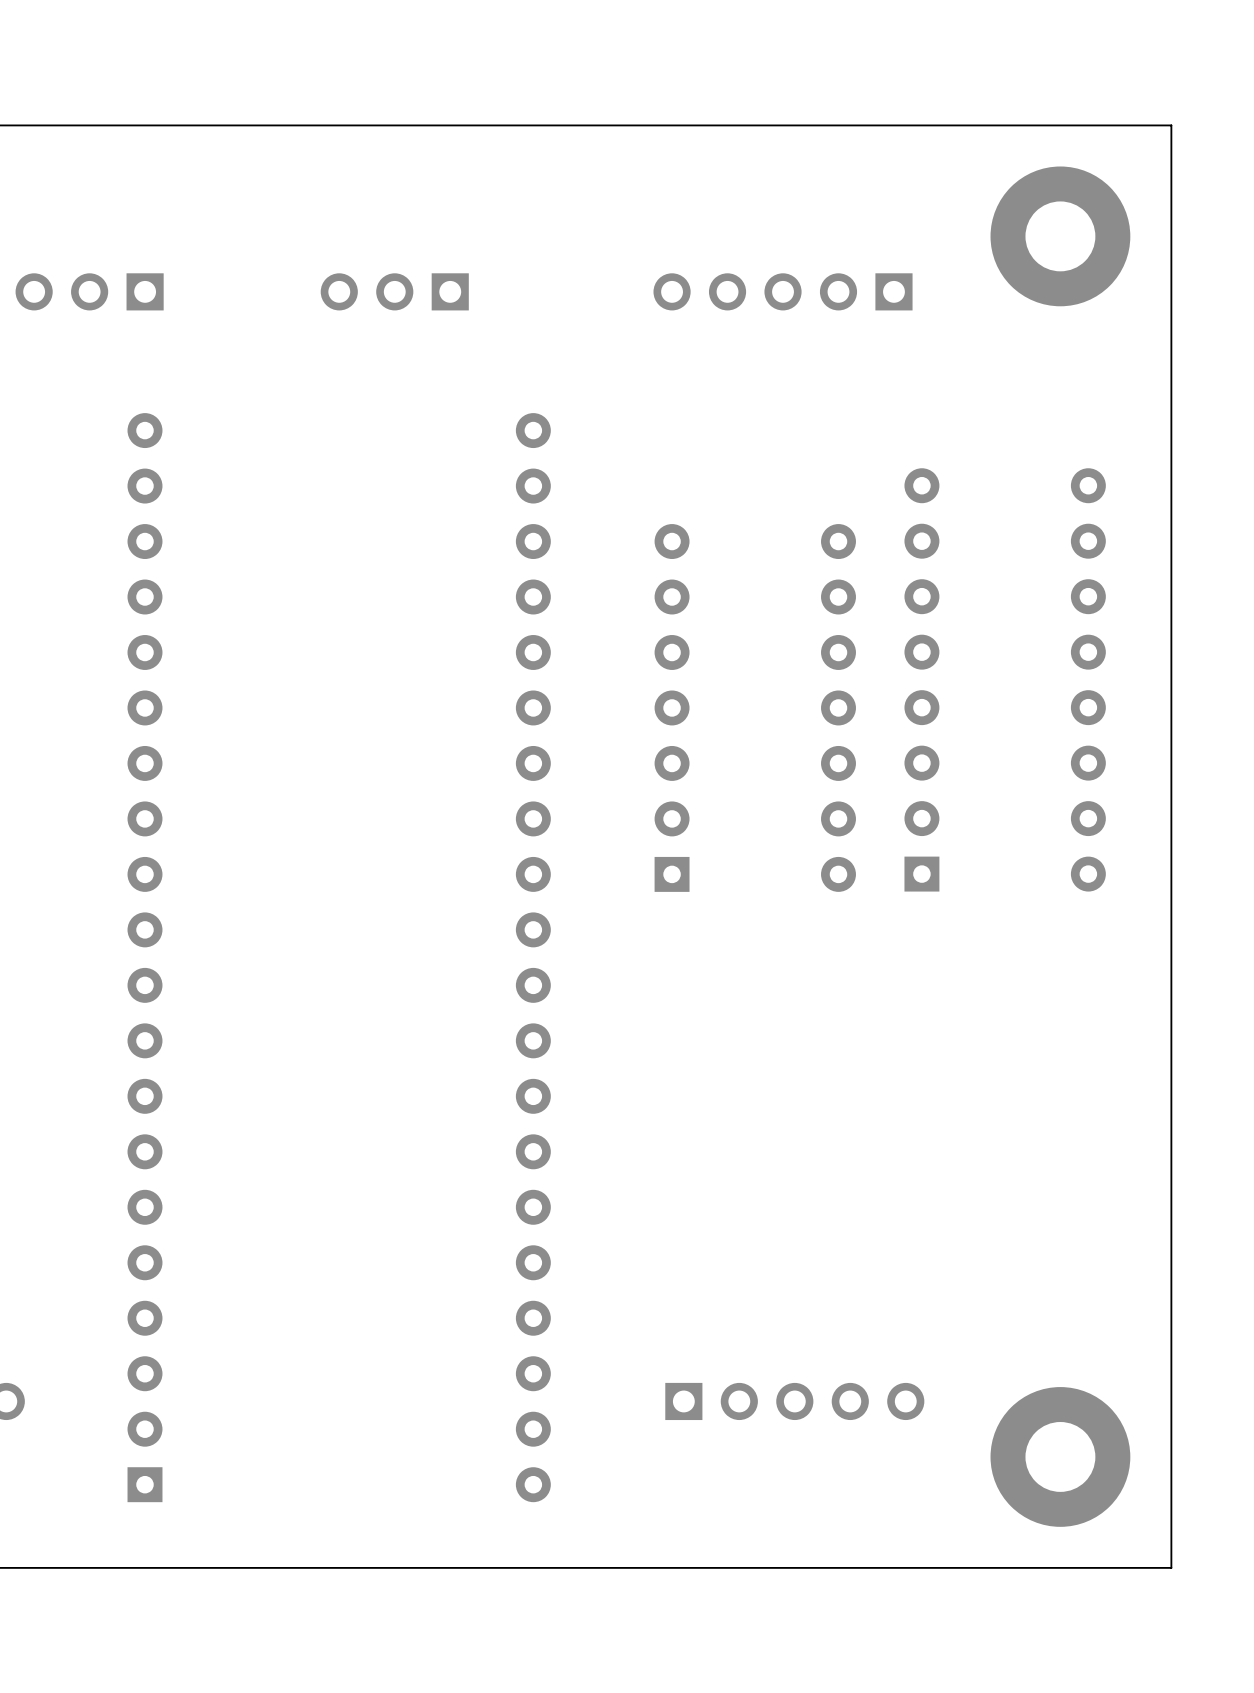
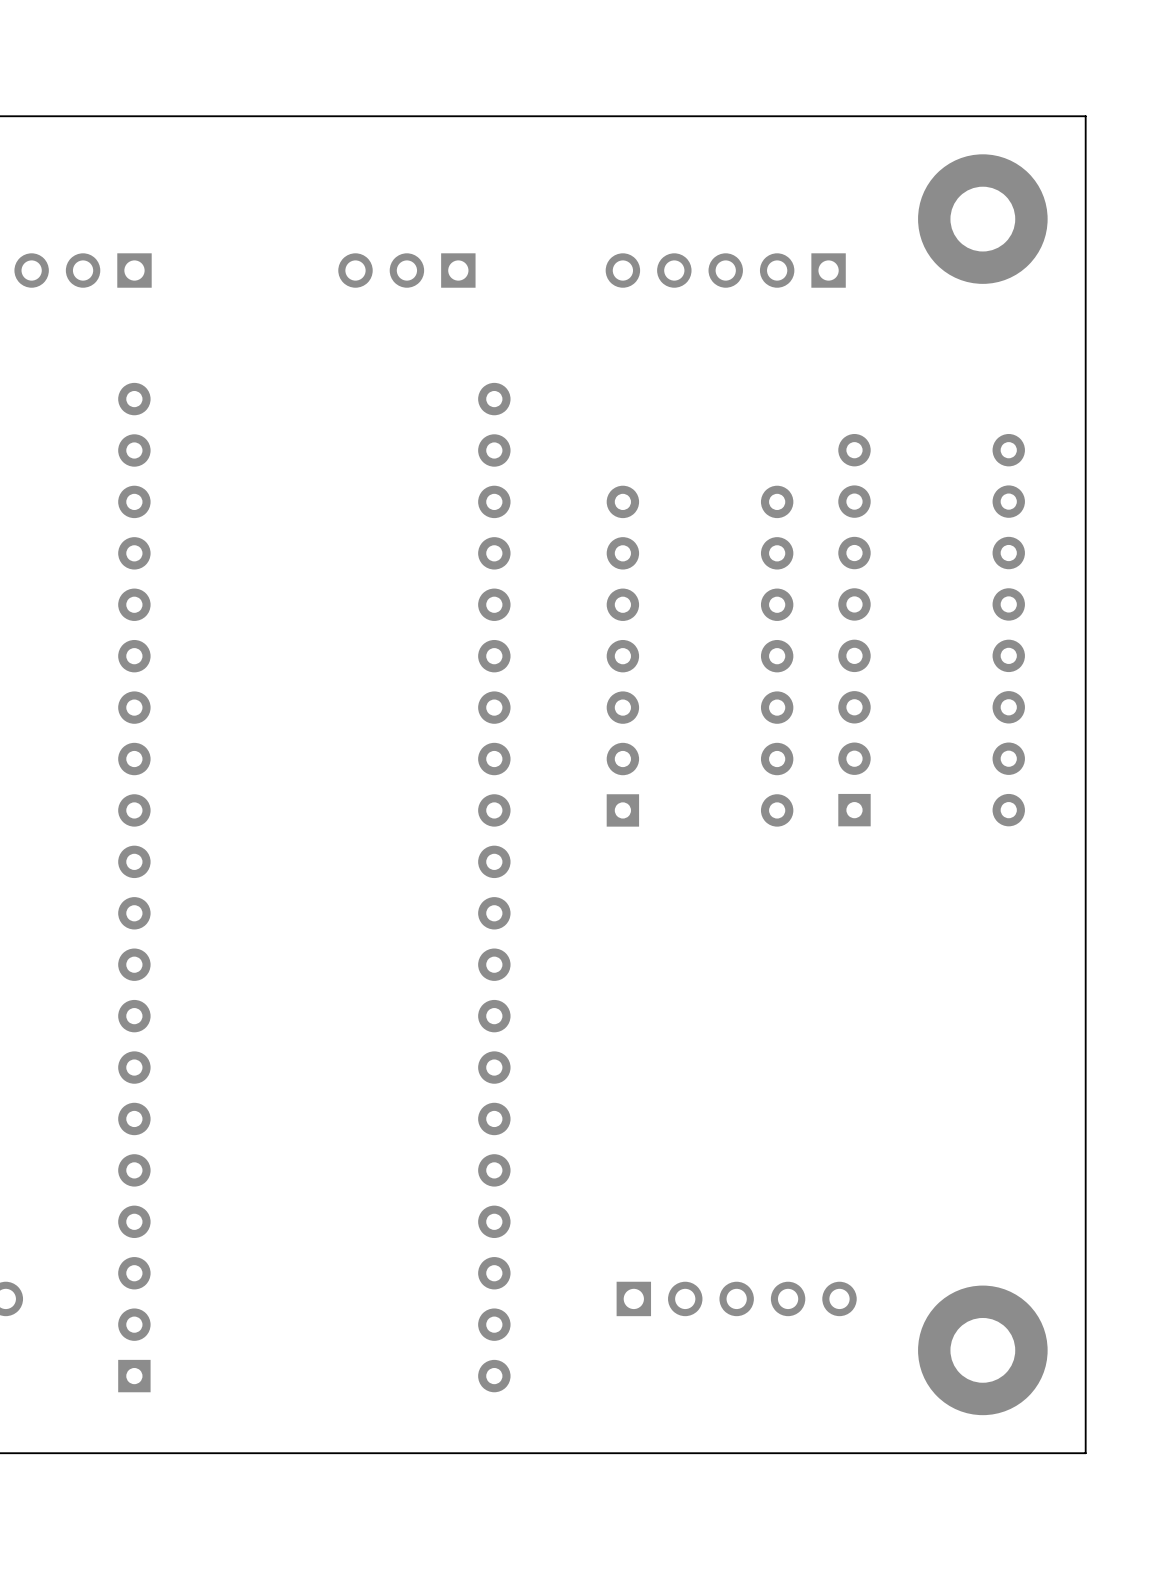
part position: (394, 291) -> (406, 270)

